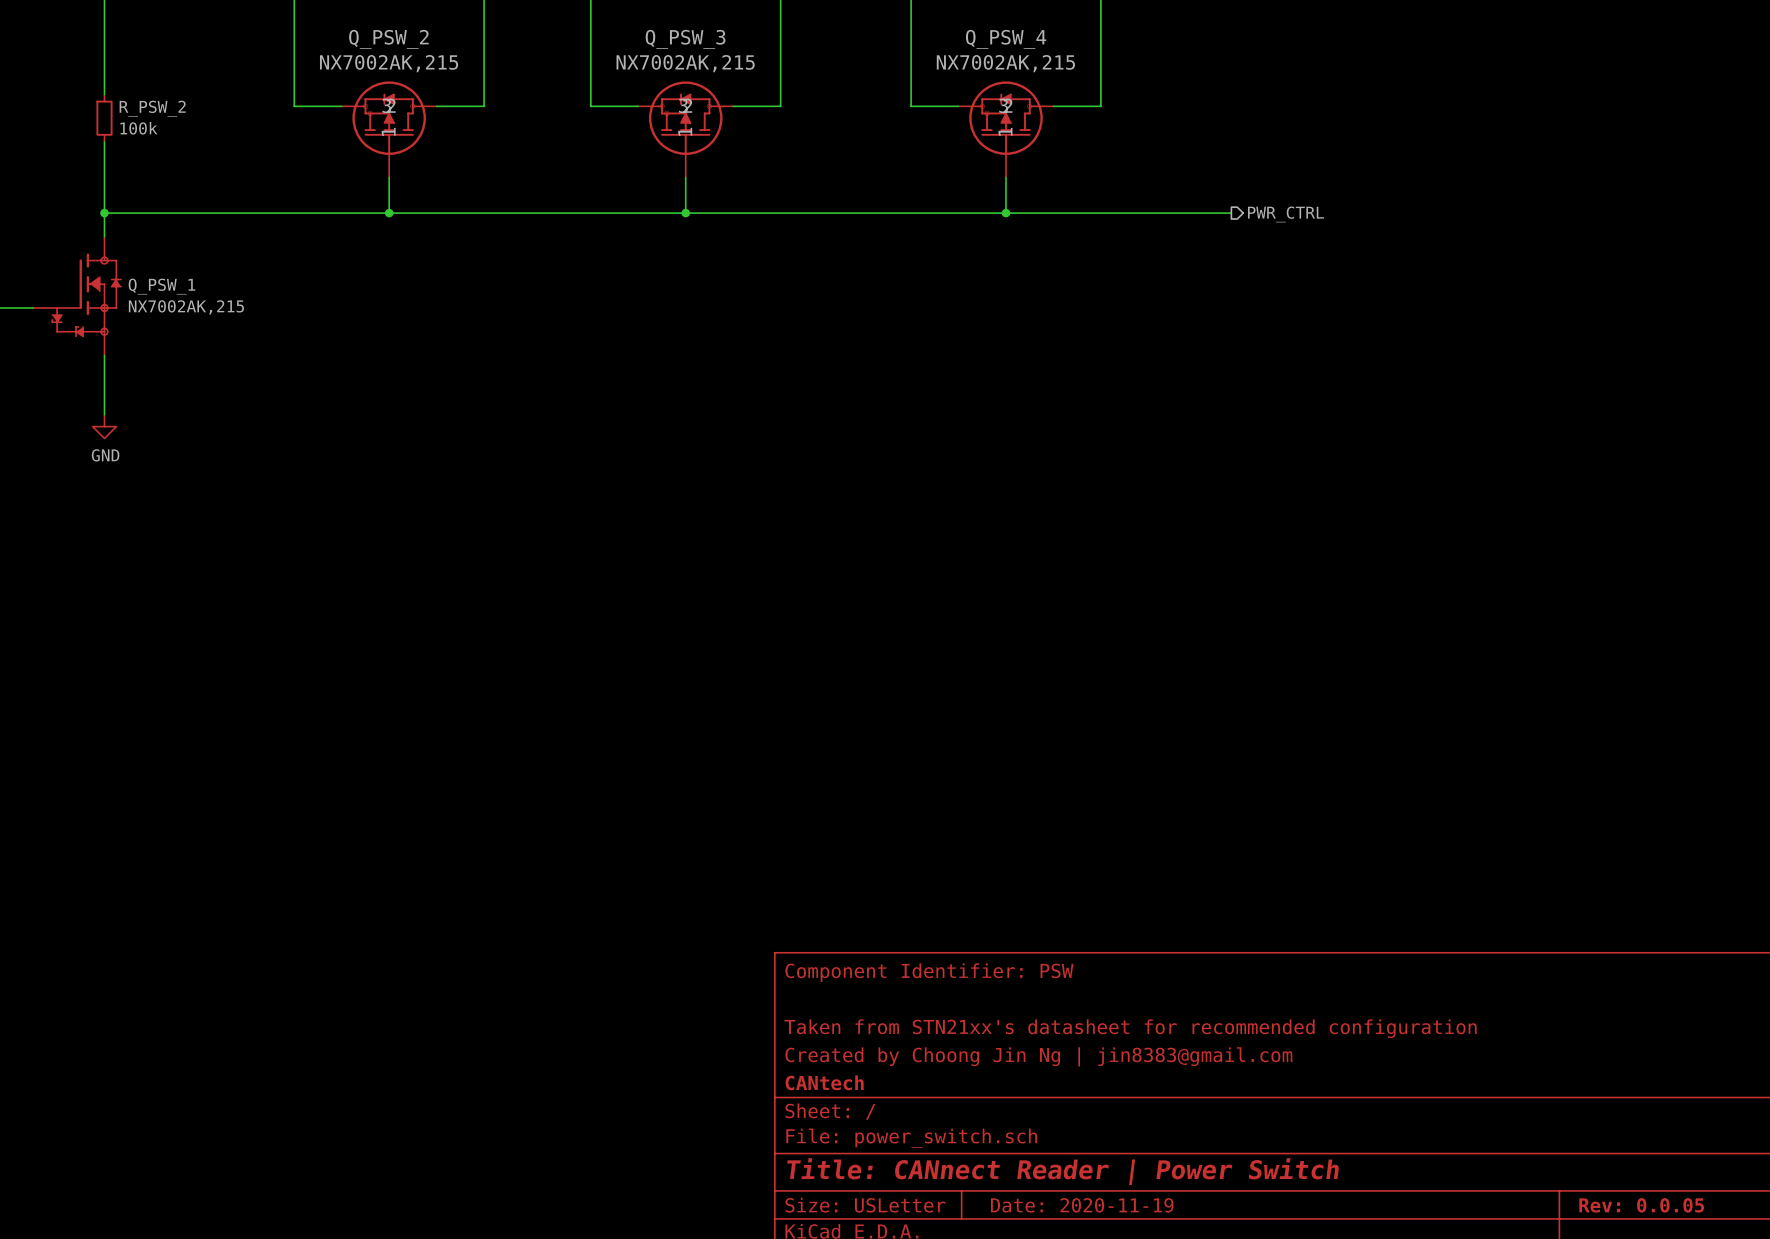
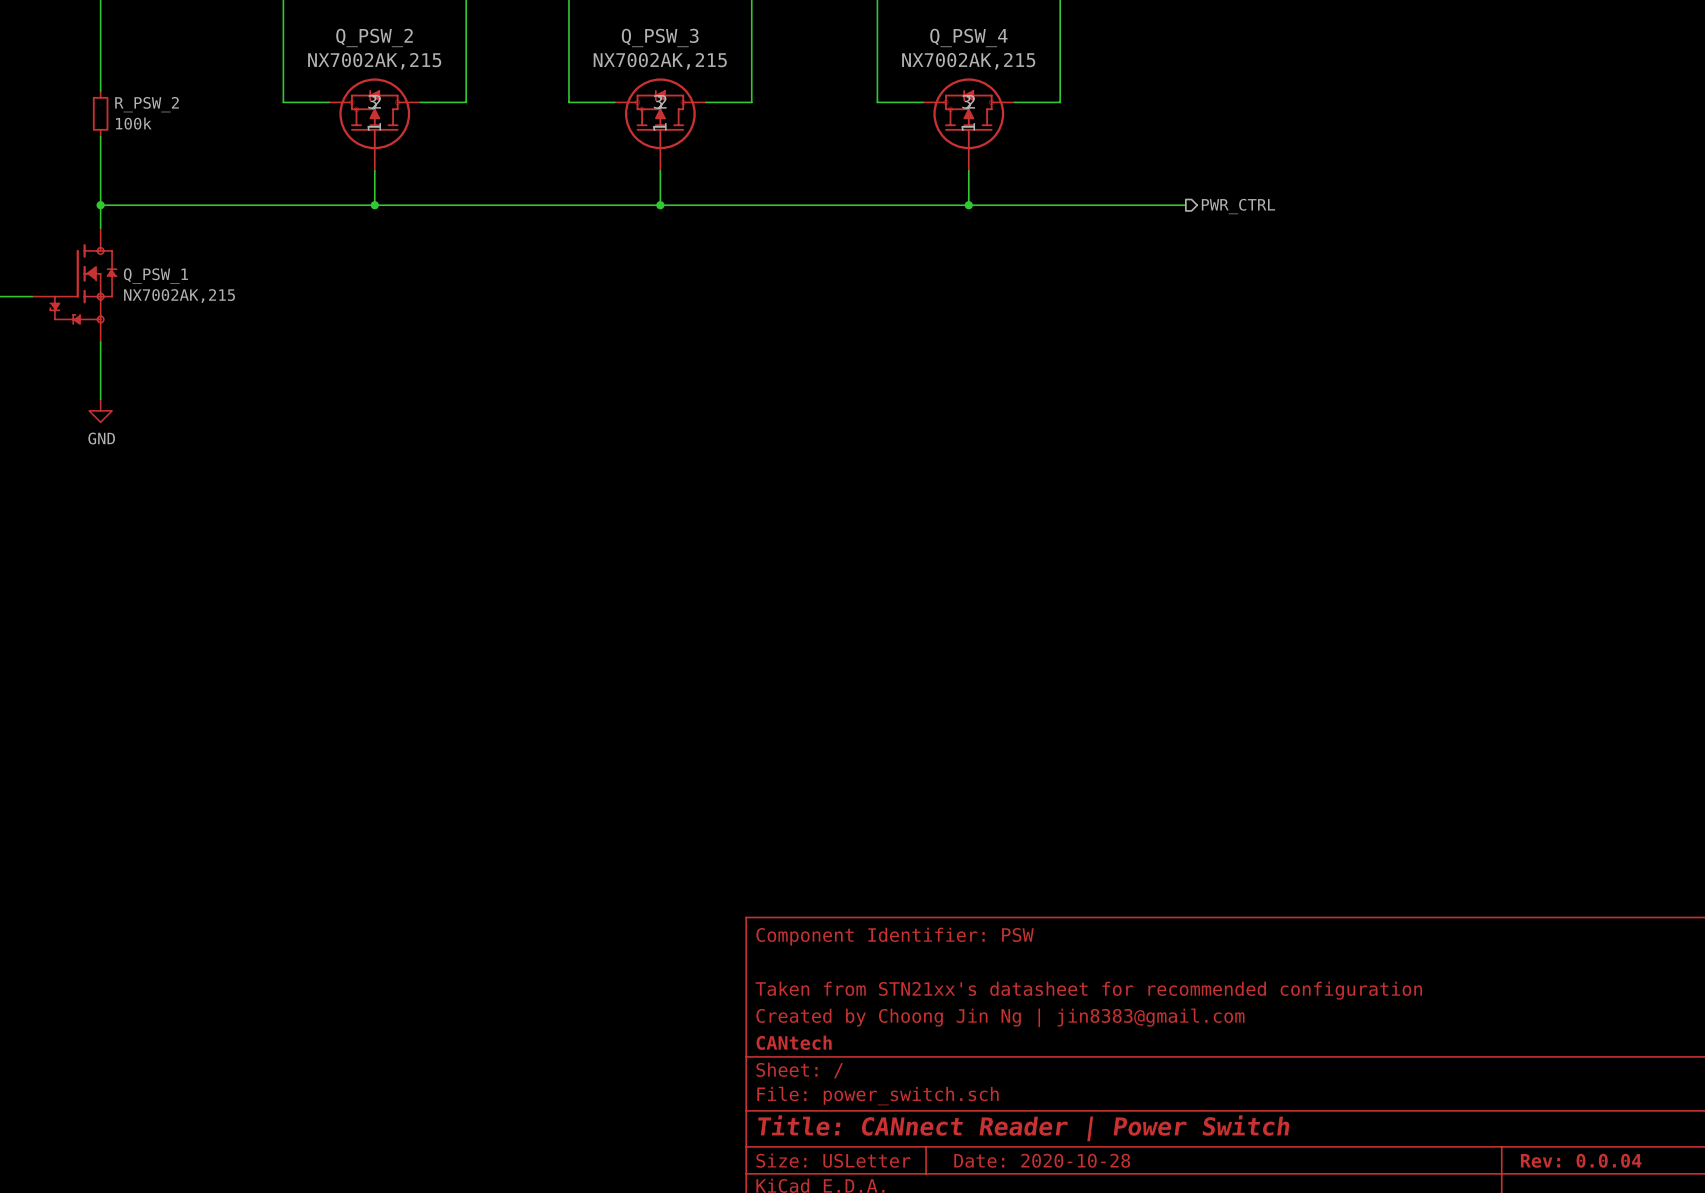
title block: Date: 2020-11-19 (1082, 1205) -> Date: 2020-10-28 (1042, 1160)
title block: Rev: 0.0.05 (1641, 1205) -> Rev: 0.0.04 (1581, 1160)

